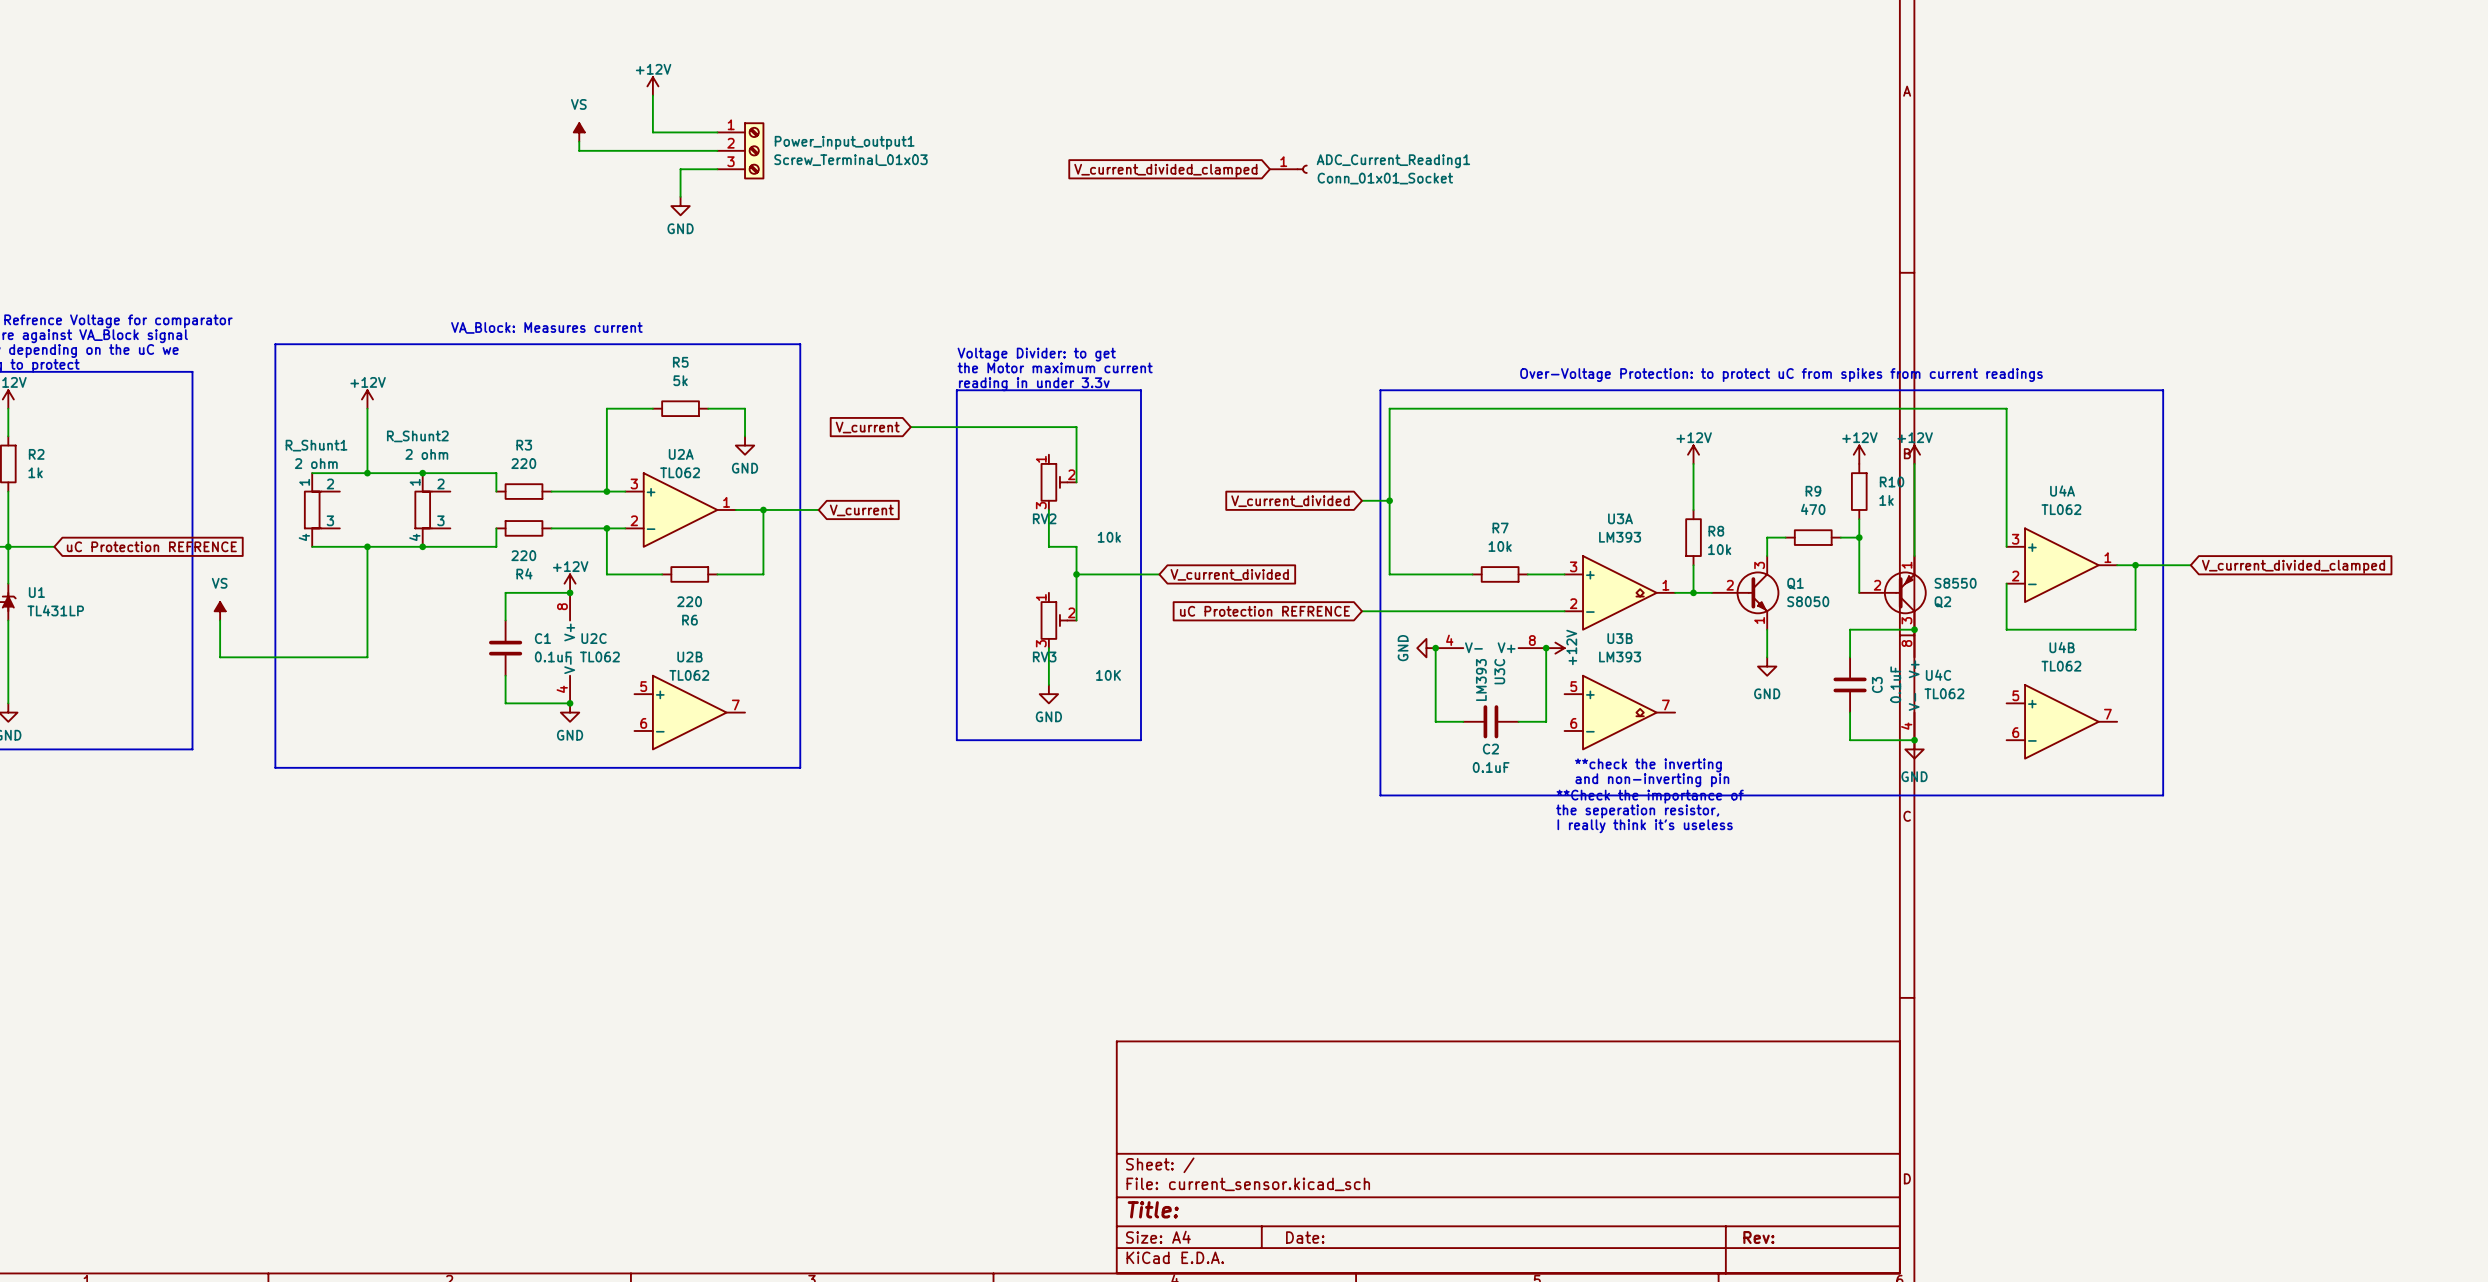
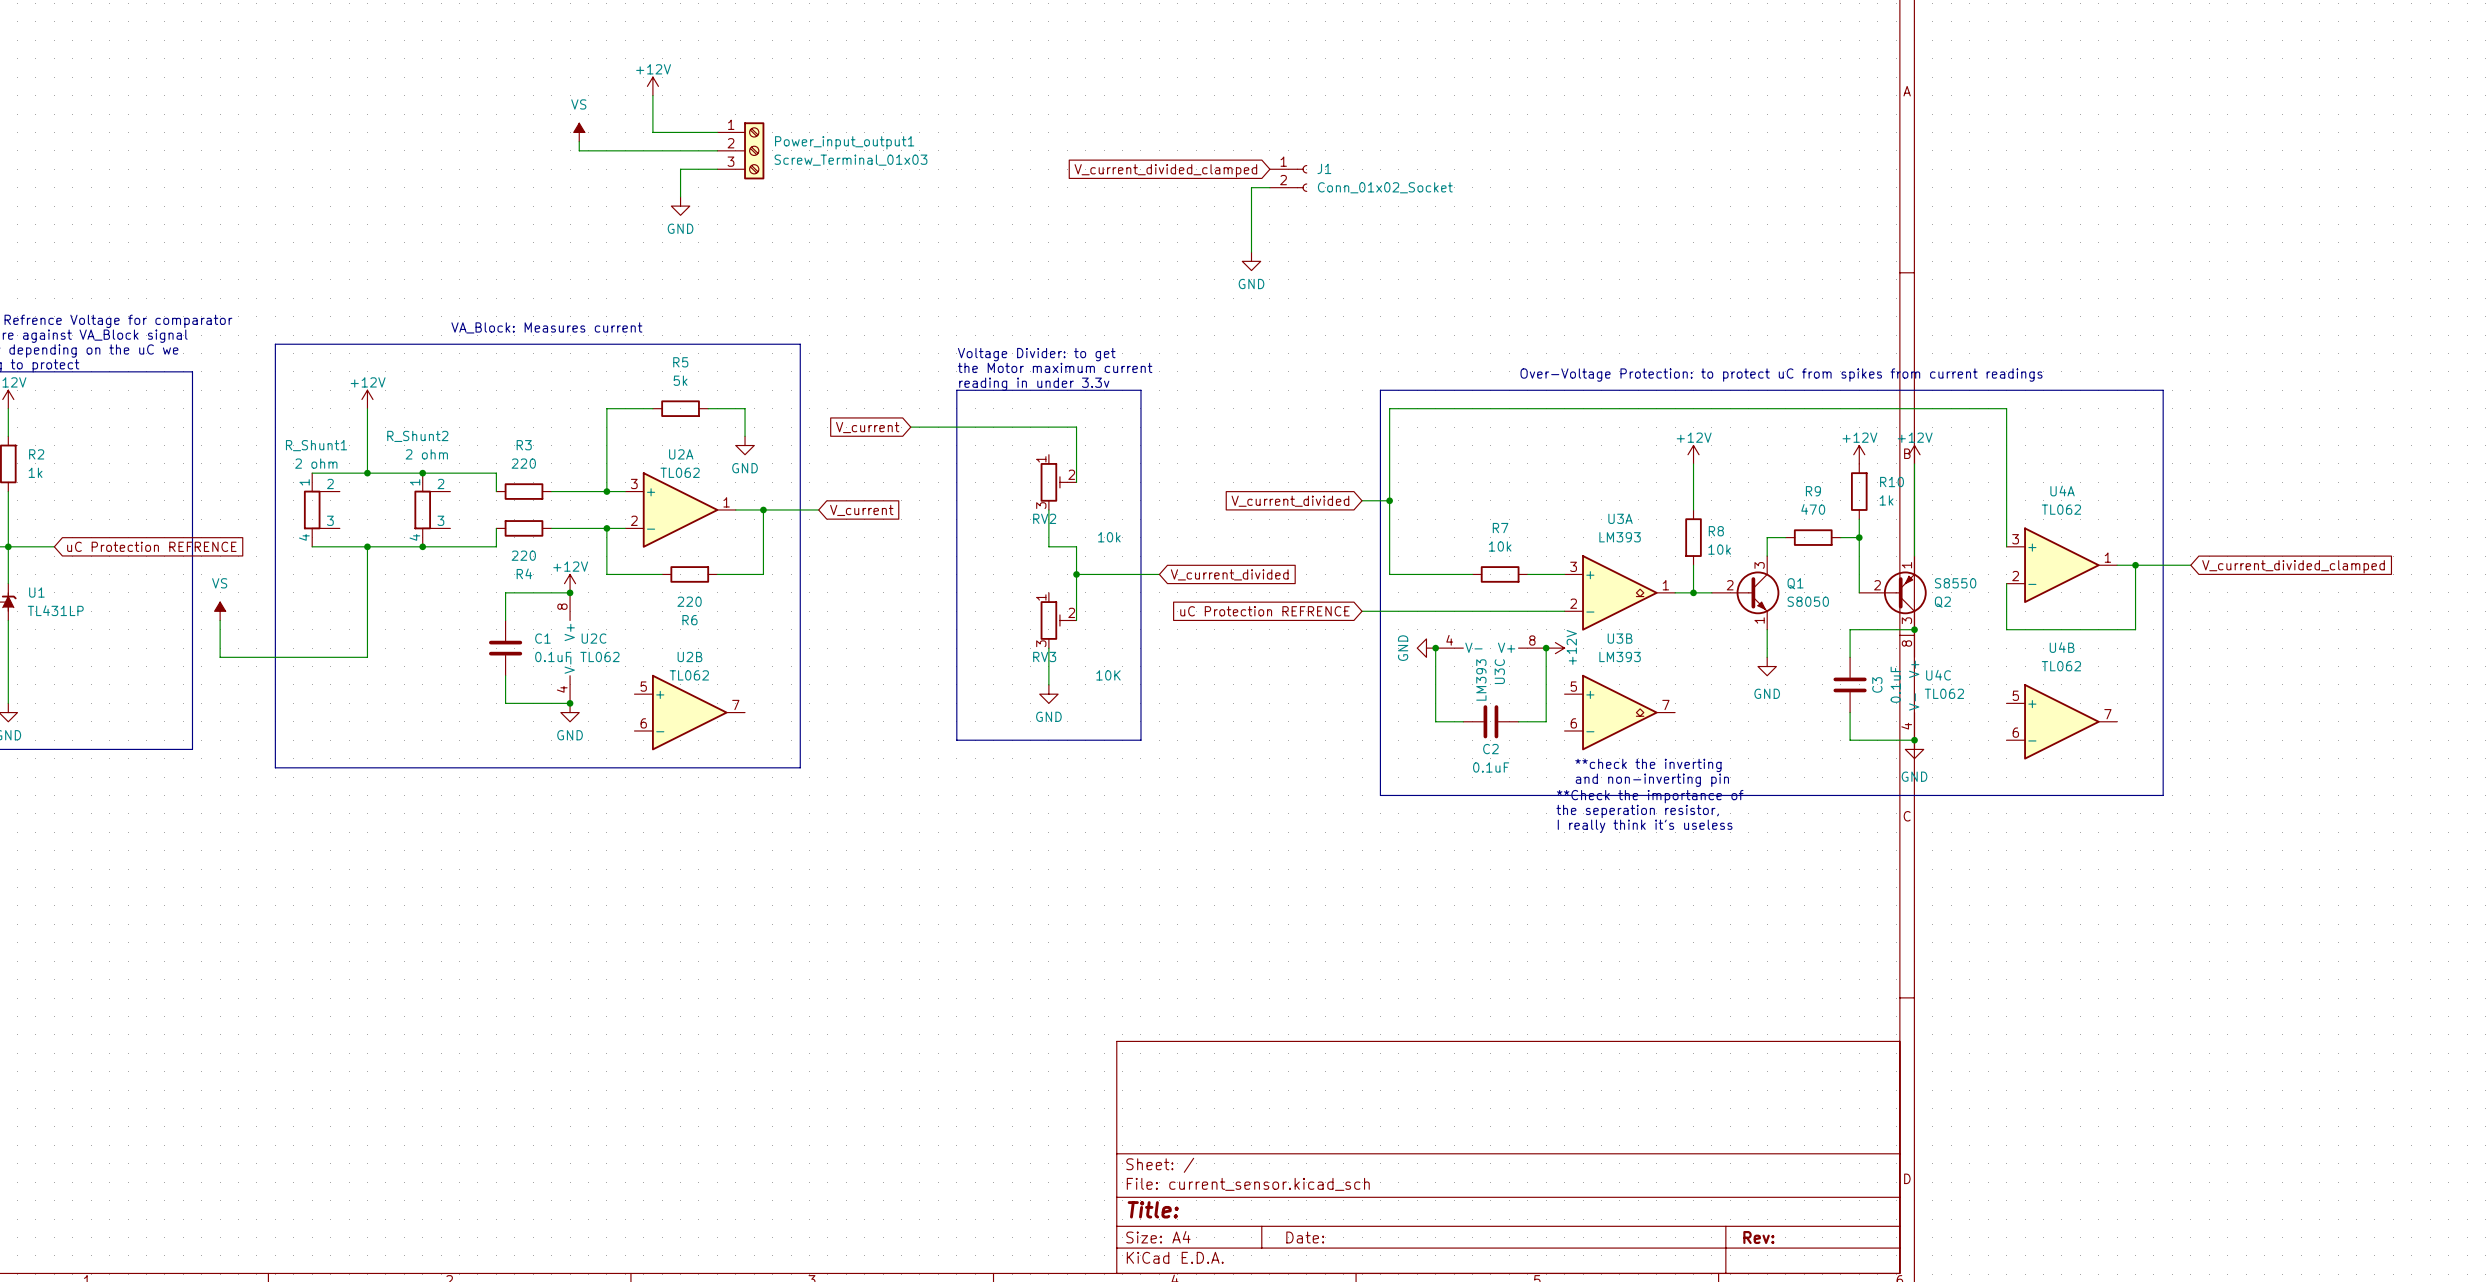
ADC_Current_Reading1: Conn_01x01_Socket (1288, 169) -> none
J1: none -> Conn_01x02_Socket (1288, 178)
wire: none -> (1269, 187) (1251, 187) (1251, 252)
power symbol: none -> GND (1251, 261)

